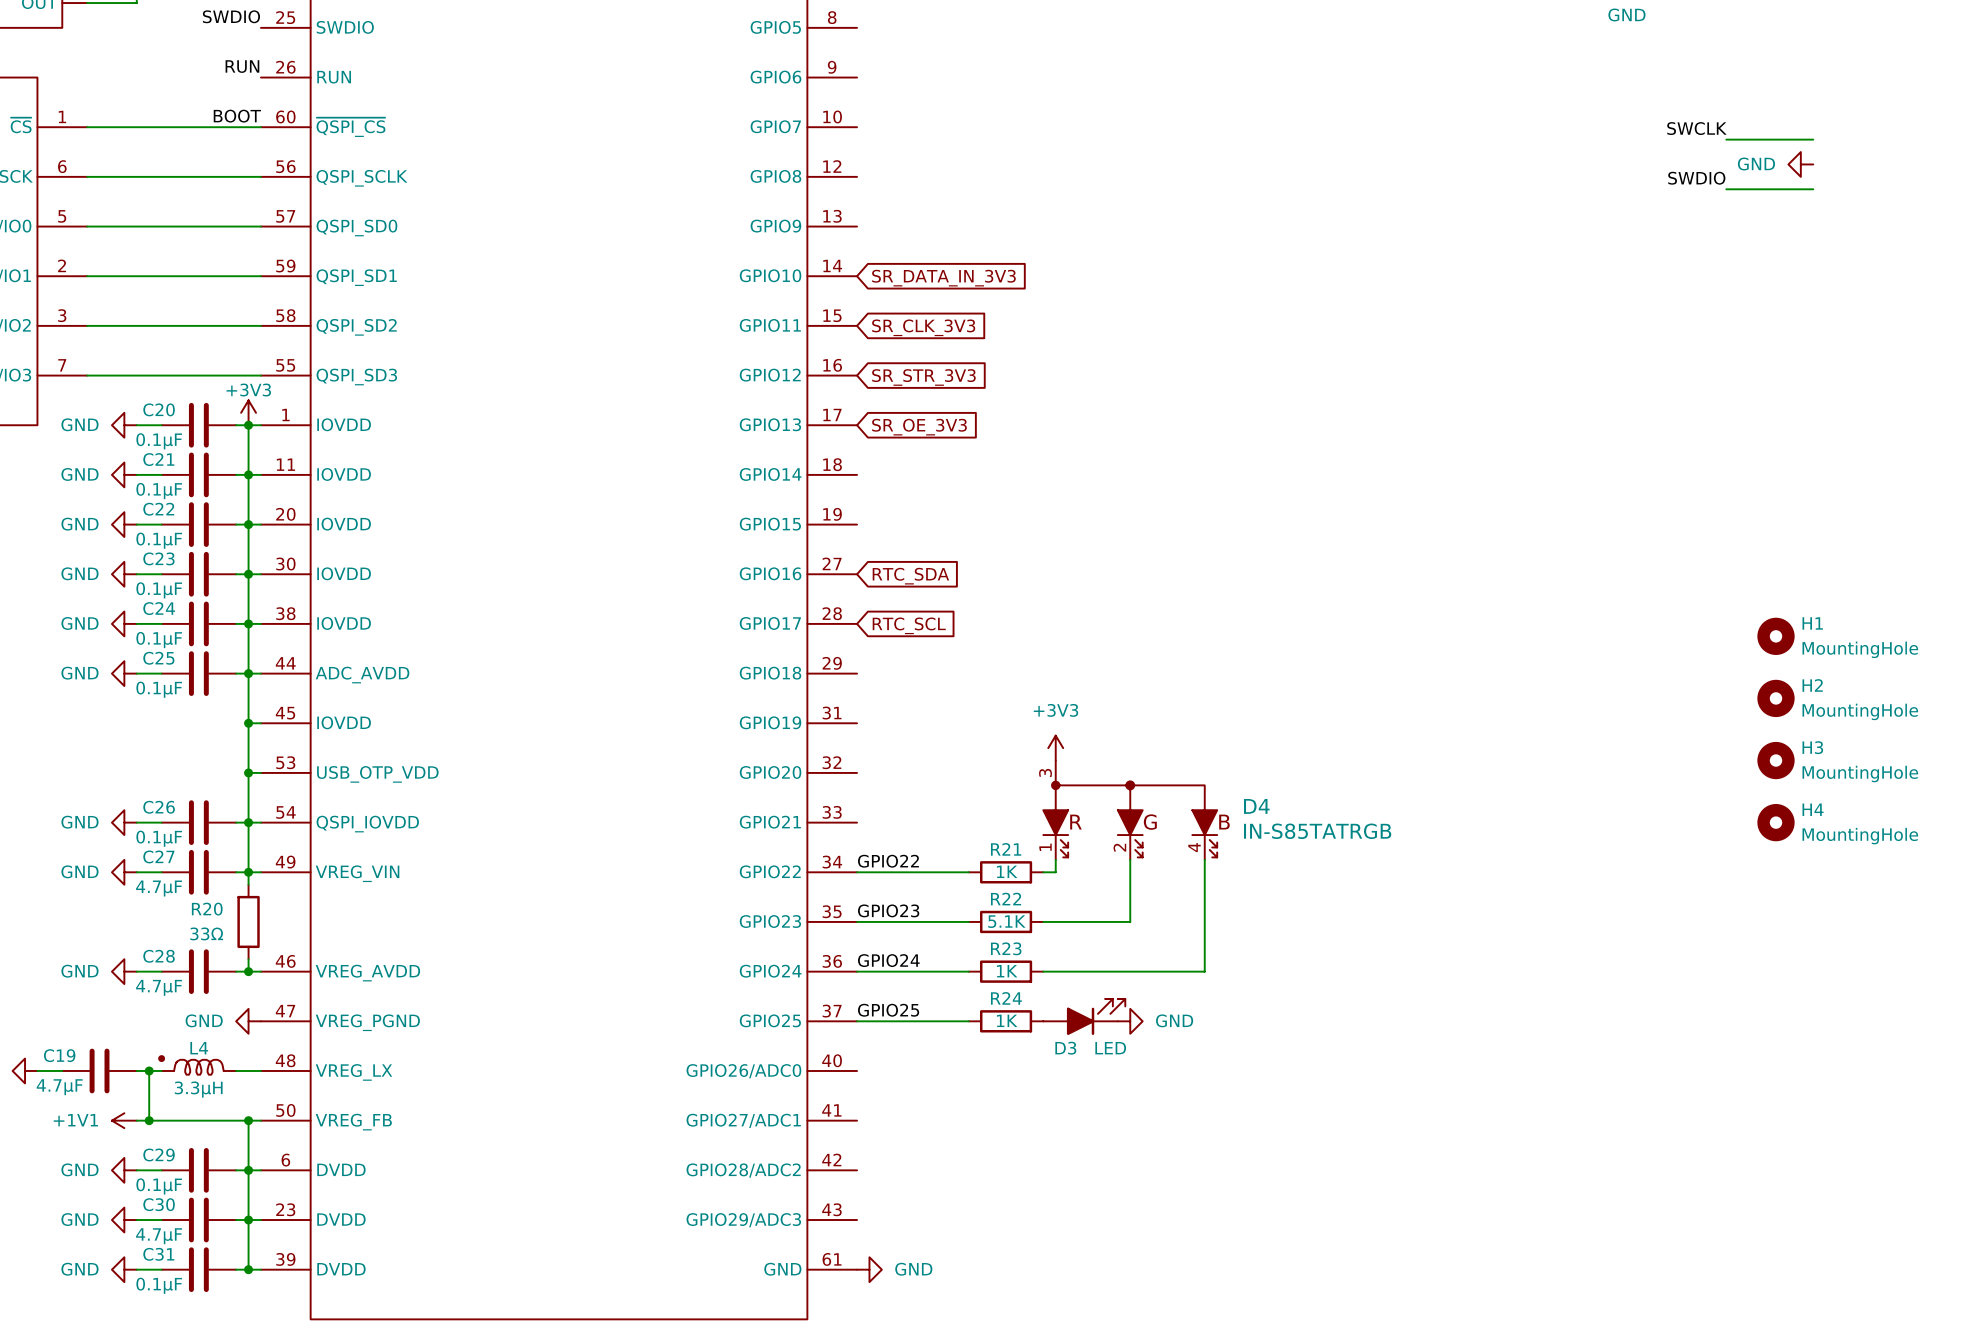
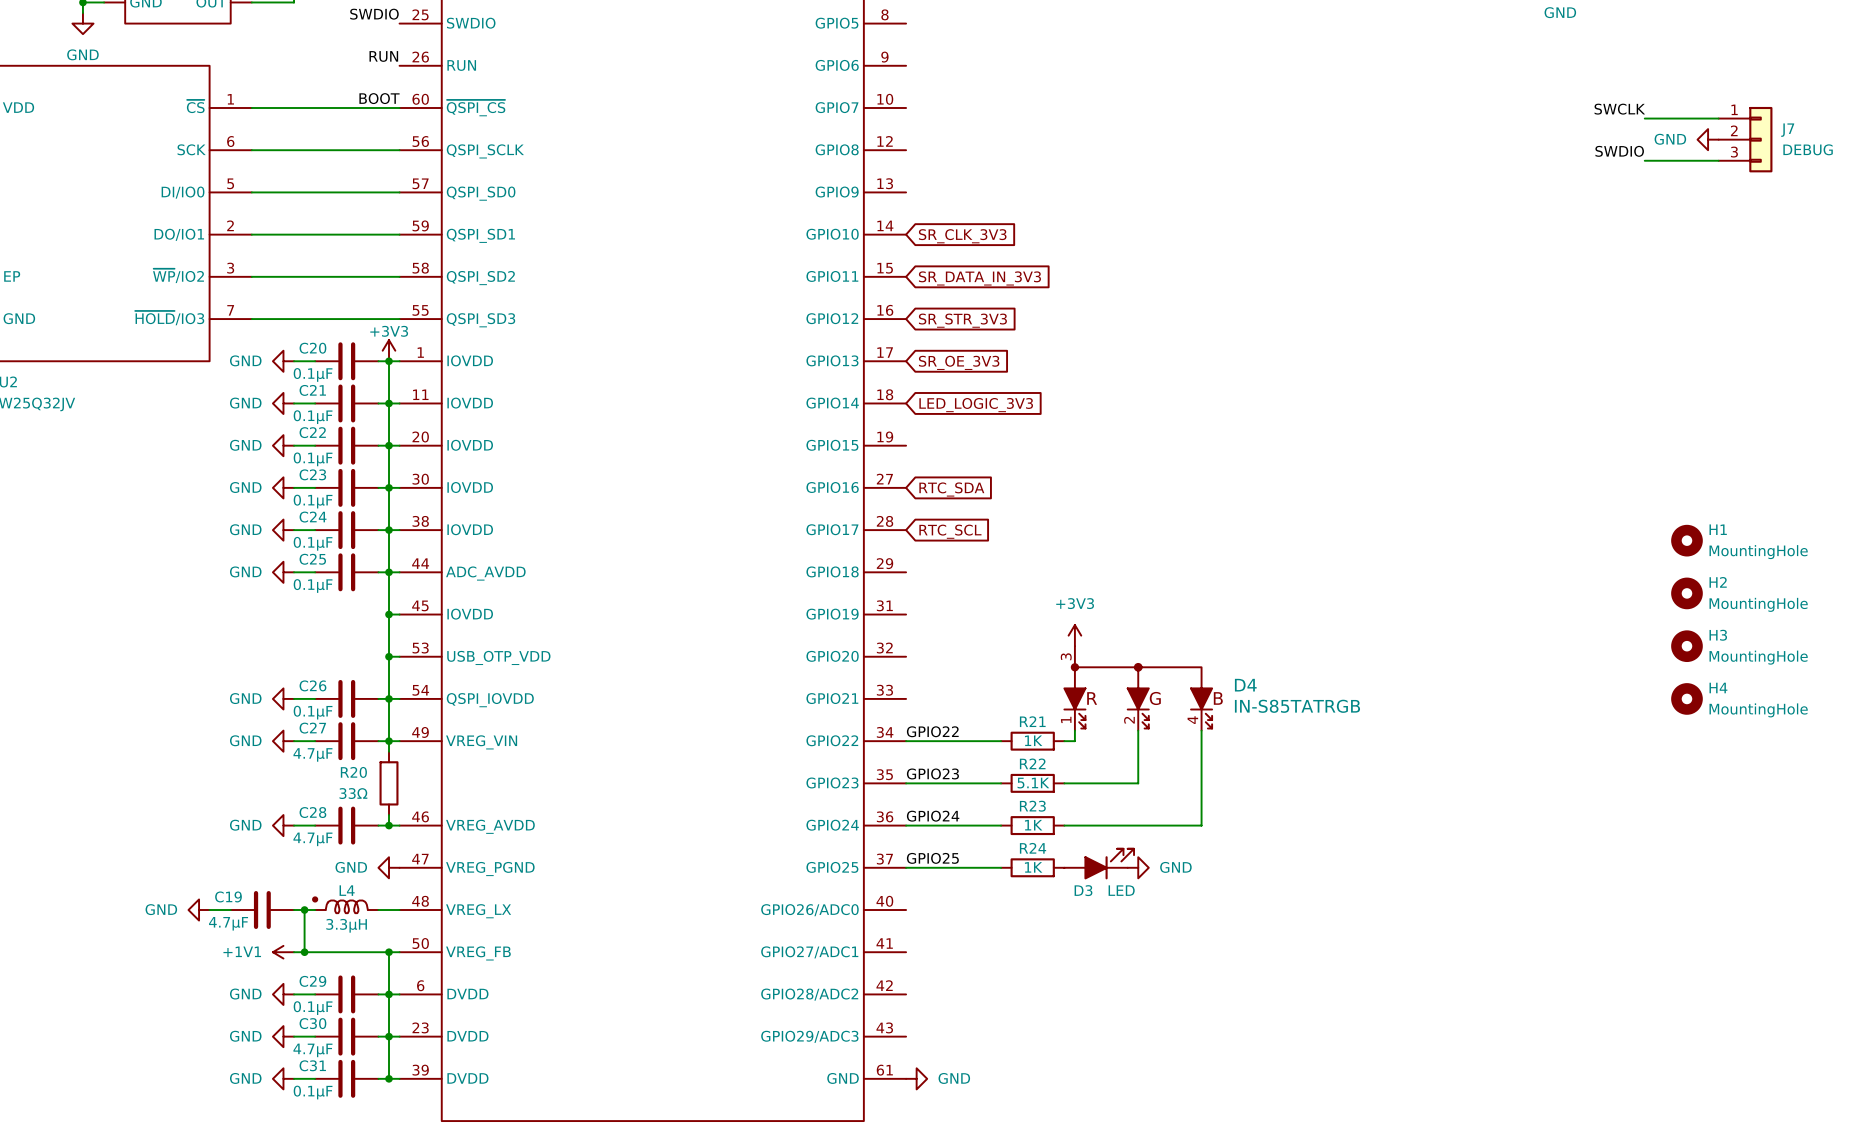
J7: none -> DEBUG (1745, 139)
global label: SR_DATA_IN_3V3 (943, 278) -> SR_CLK_3V3 (962, 236)
global label: SR_CLK_3V3 (923, 327) -> SR_DATA_IN_3V3 (979, 278)
global label: none -> LED_LOGIC_3V3 (976, 405)

